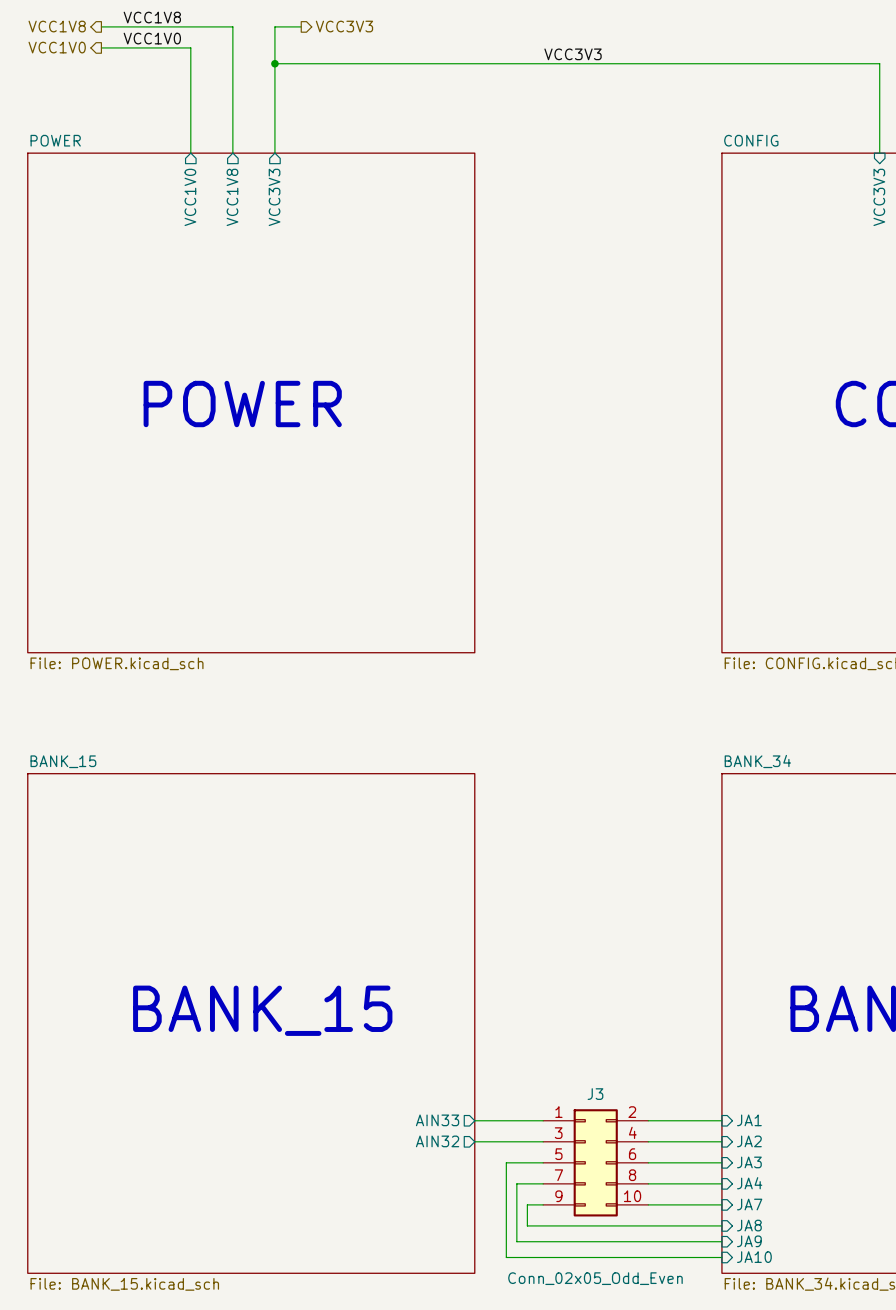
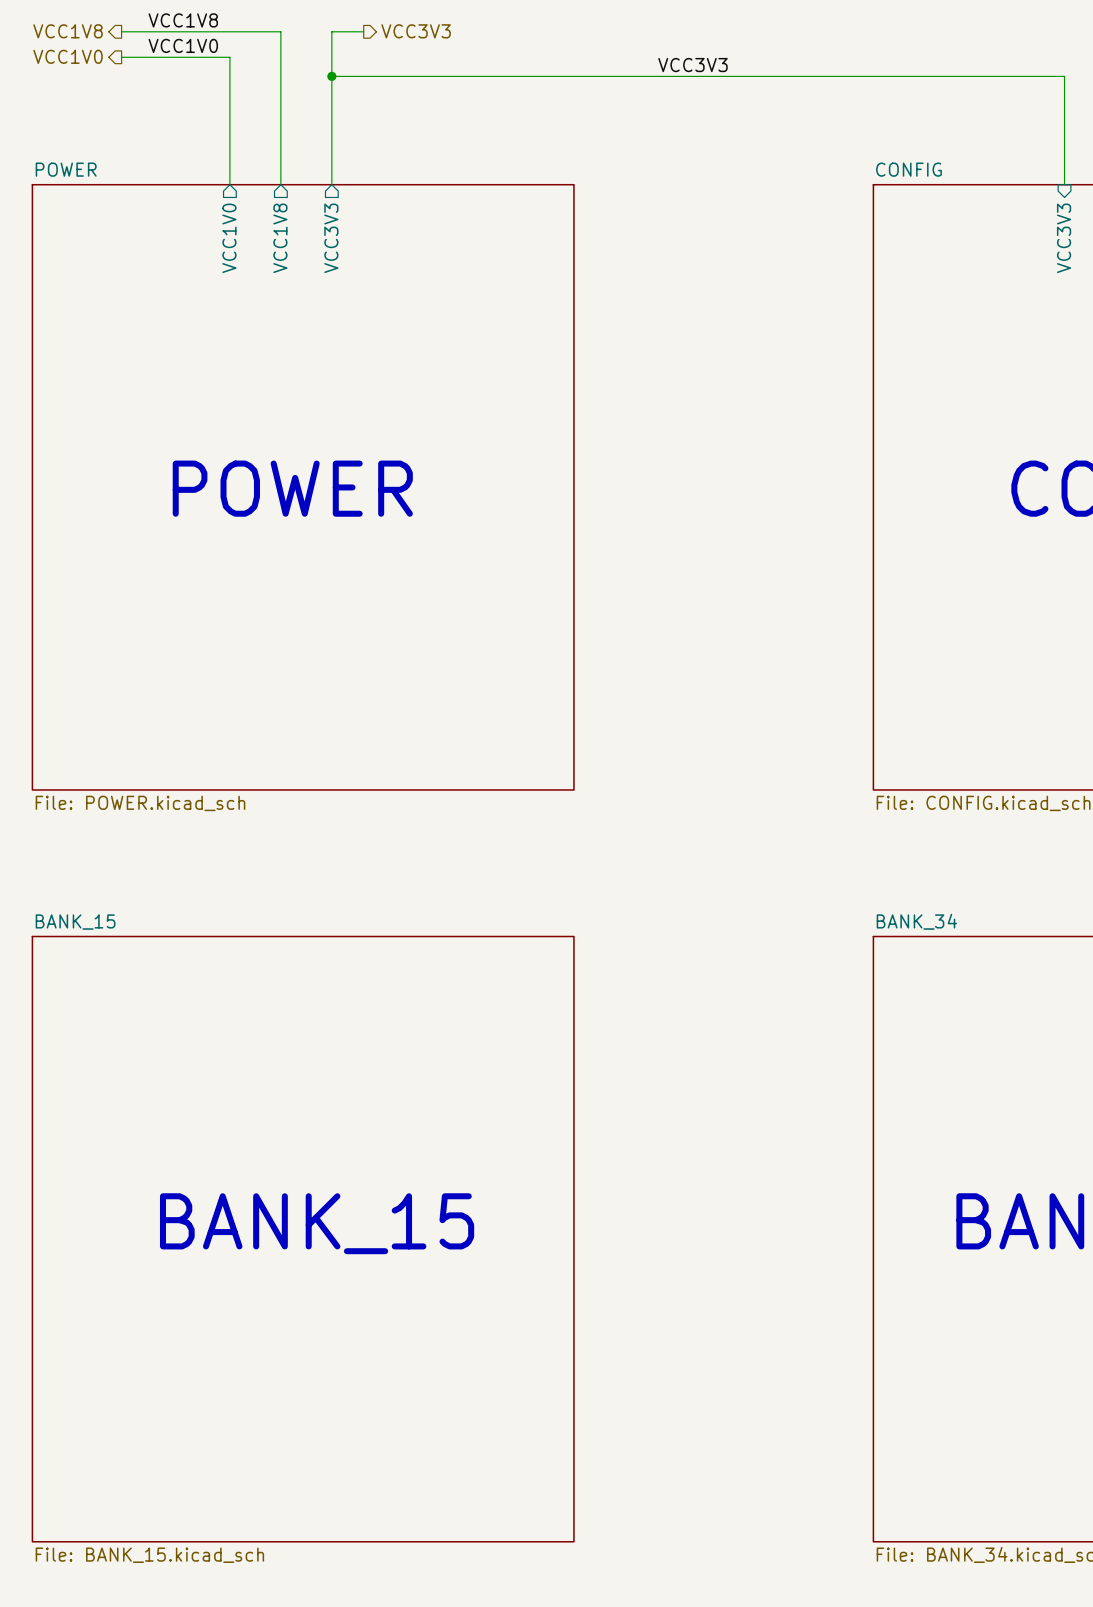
sheet pin: AIN33 (437, 1120) -> none
wire: (474, 1120) (543, 1120) -> none
wire: (648, 1120) (721, 1120) -> none
sheet pin: JA1 (749, 1120) -> none
sheet pin: AIN32 (437, 1141) -> none
wire: (474, 1141) (543, 1141) -> none
wire: (648, 1141) (721, 1141) -> none
sheet pin: JA2 (749, 1141) -> none
wire: (543, 1162) (506, 1162) (506, 1257) (721, 1257) -> none
J3: Conn_02x05_Odd_Even (595, 1162) -> none
wire: (648, 1162) (721, 1162) -> none
sheet pin: JA3 (749, 1162) -> none
wire: (543, 1183) (516, 1183) (516, 1241) (721, 1241) -> none
wire: (648, 1183) (721, 1183) -> none
sheet pin: JA4 (749, 1183) -> none
wire: (543, 1204) (527, 1204) (527, 1225) (721, 1225) -> none
wire: (648, 1204) (721, 1204) -> none
sheet pin: JA7 (749, 1204) -> none
sheet pin: JA8 (749, 1225) -> none
sheet pin: JA9 (749, 1241) -> none
sheet pin: JA10 (754, 1257) -> none

